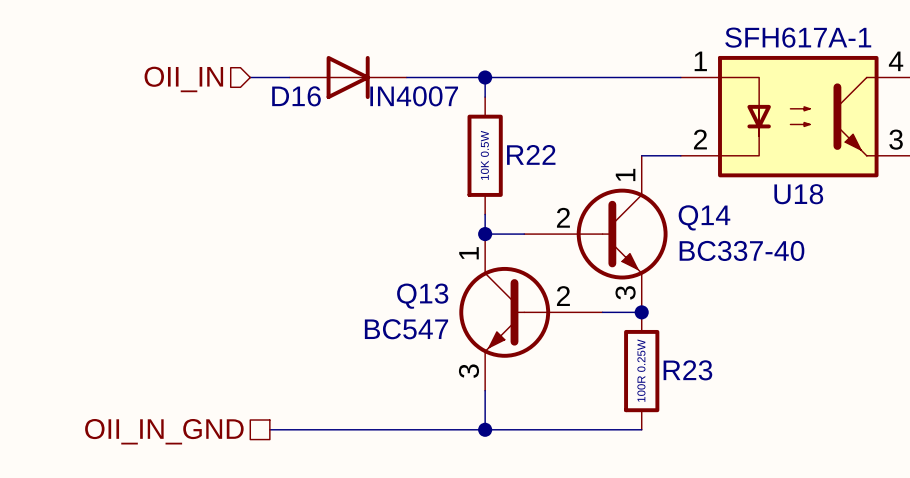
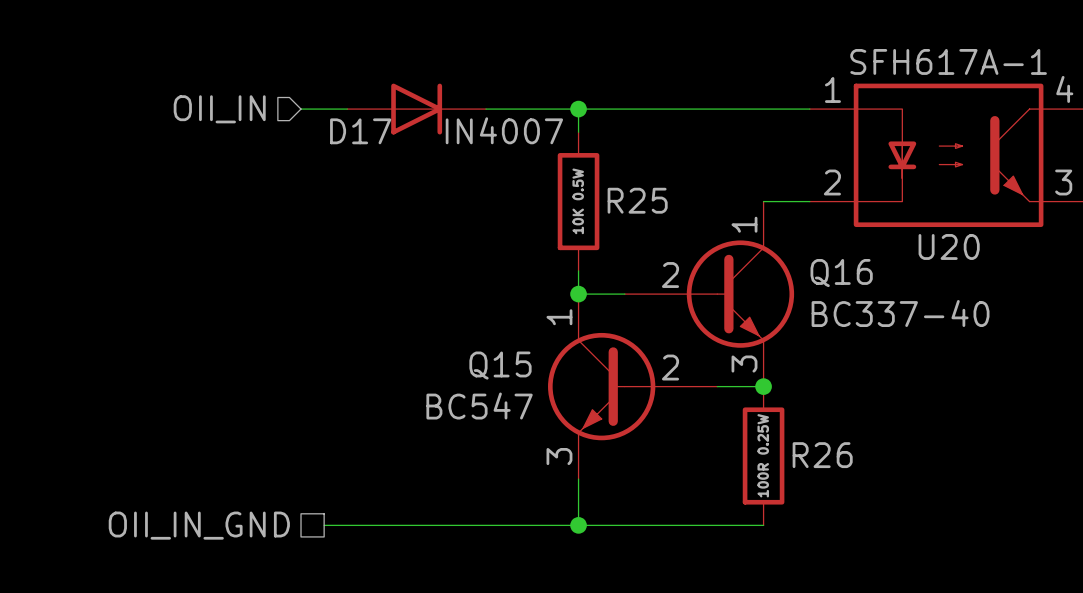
D16 name: D16 (296, 96) -> D17 (360, 131)
R22 name: R22 (531, 154) -> R25 (637, 200)
U18 name: U18 (798, 194) -> U20 (949, 246)
Q14 name: Q14 (704, 217) -> Q16 (841, 273)
Q13 name: Q13 (422, 296) -> Q15 (500, 365)
R23 name: R23 (687, 370) -> R26 (822, 455)

